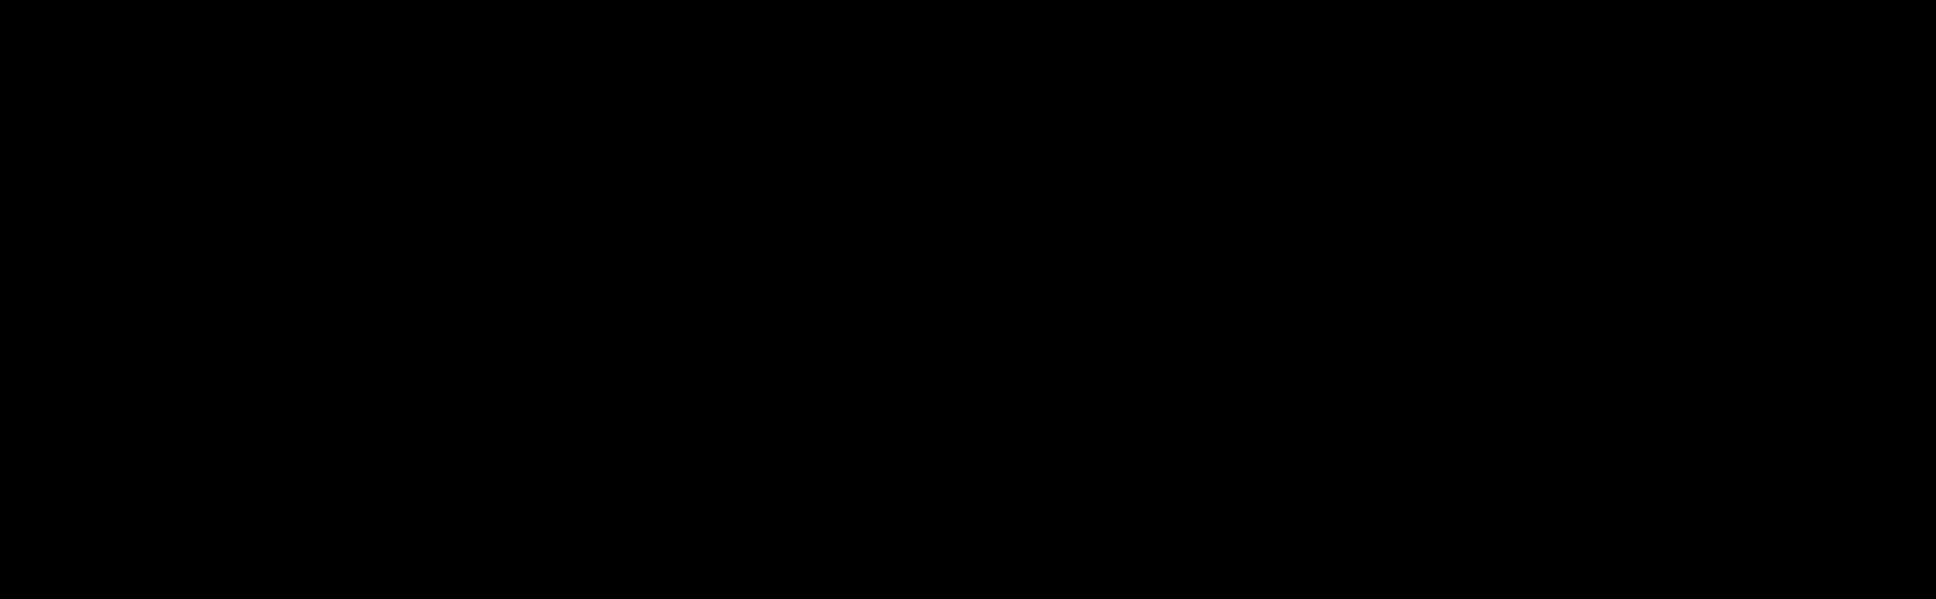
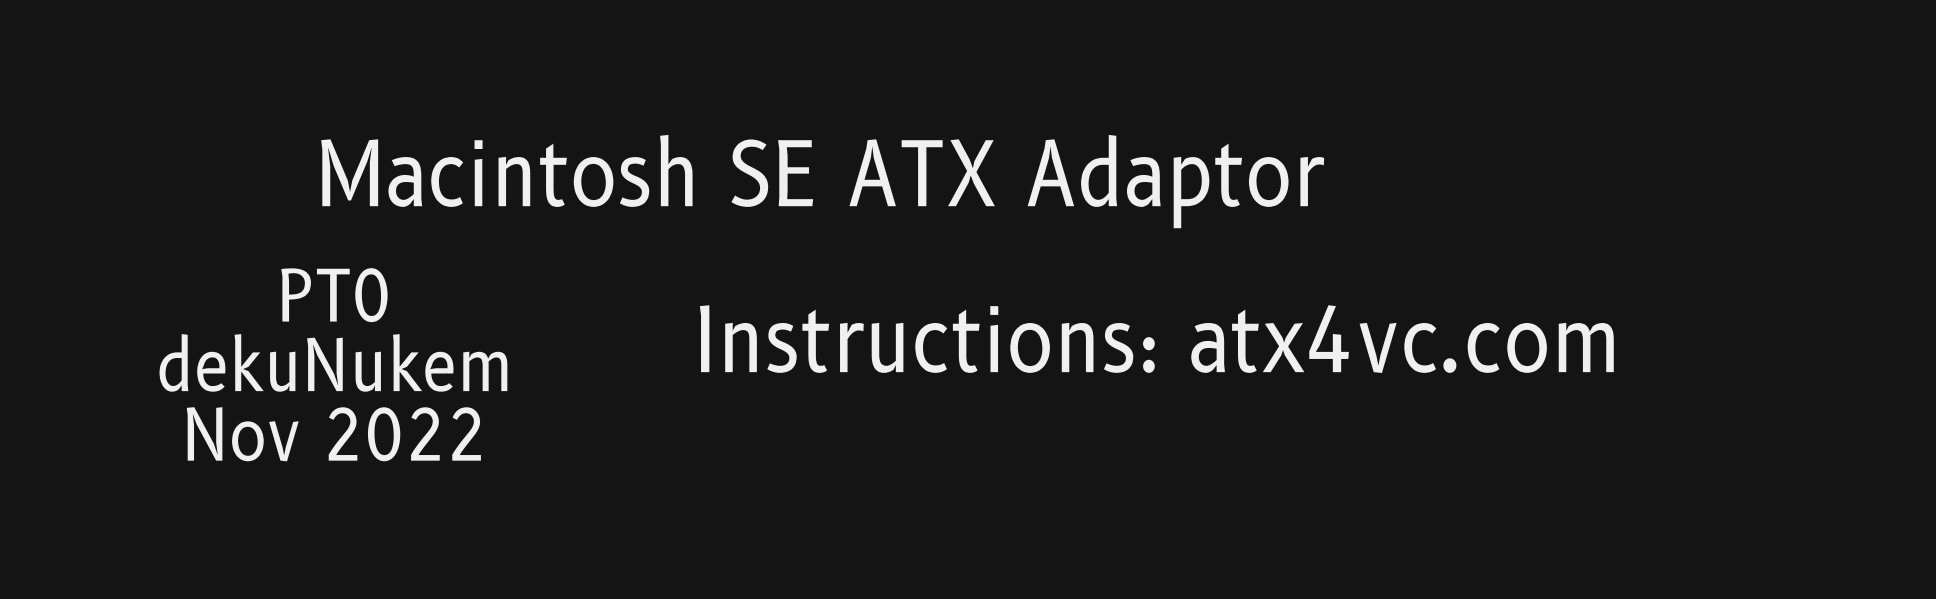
text: none -> Macintosh SE ATX Adaptor (822, 181)
text: none -> PT0 (334, 295)
text: none -> Instructions: atx4vc.com (1156, 339)
text: none -> dekuNukem (333, 362)
text: none -> Nov 2022 (333, 434)

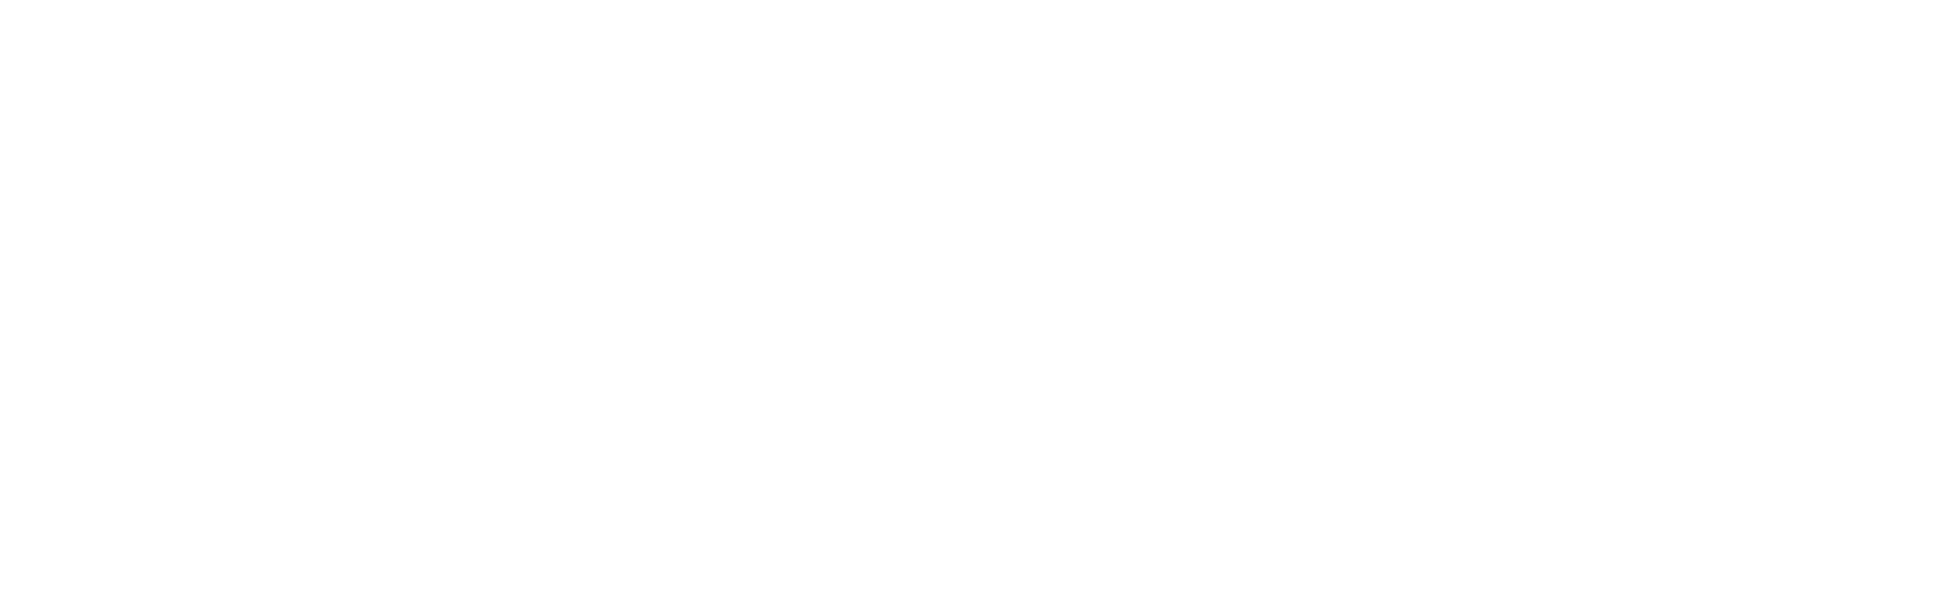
text: Macintosh SE ATX Adaptor (822, 181) -> none
text: PT0 (334, 295) -> none
text: Instructions: atx4vc.com (1156, 339) -> none
text: dekuNukem (333, 362) -> none
text: Nov 2022 (333, 434) -> none

